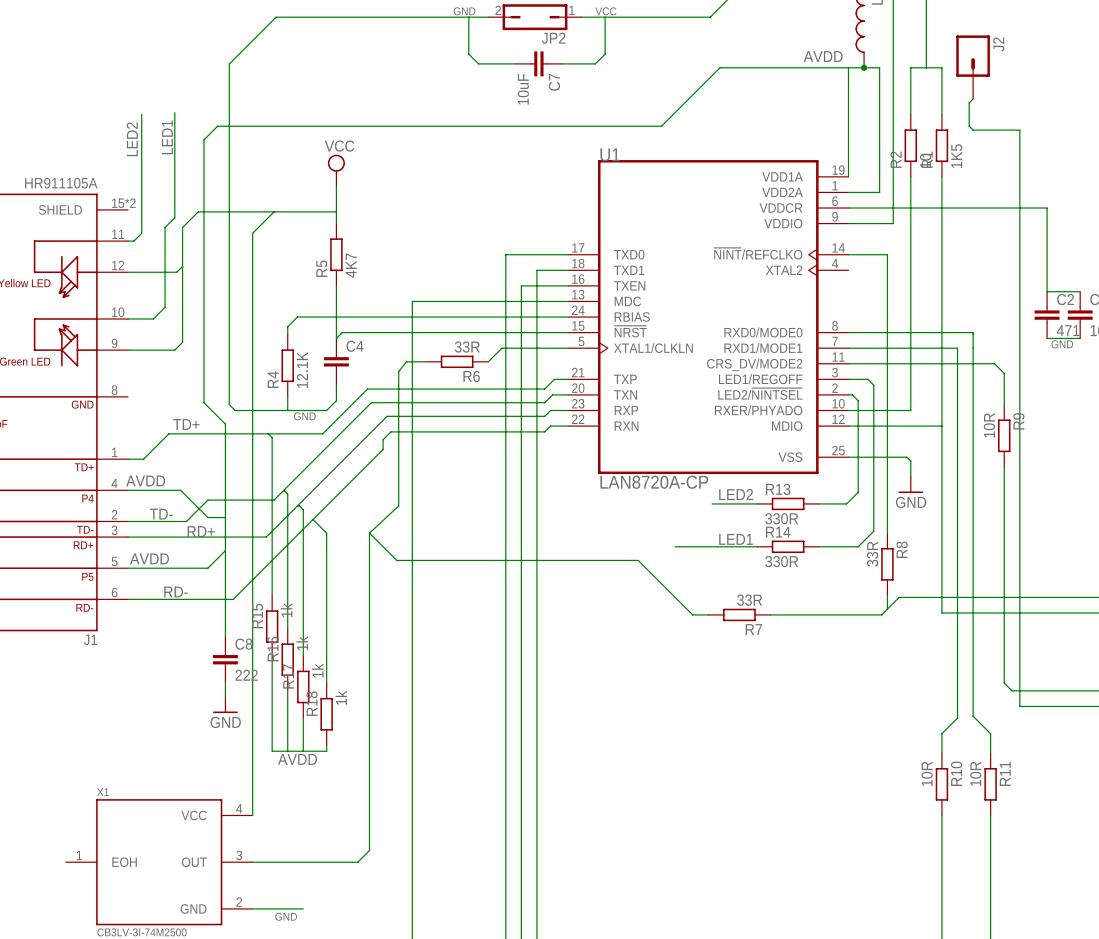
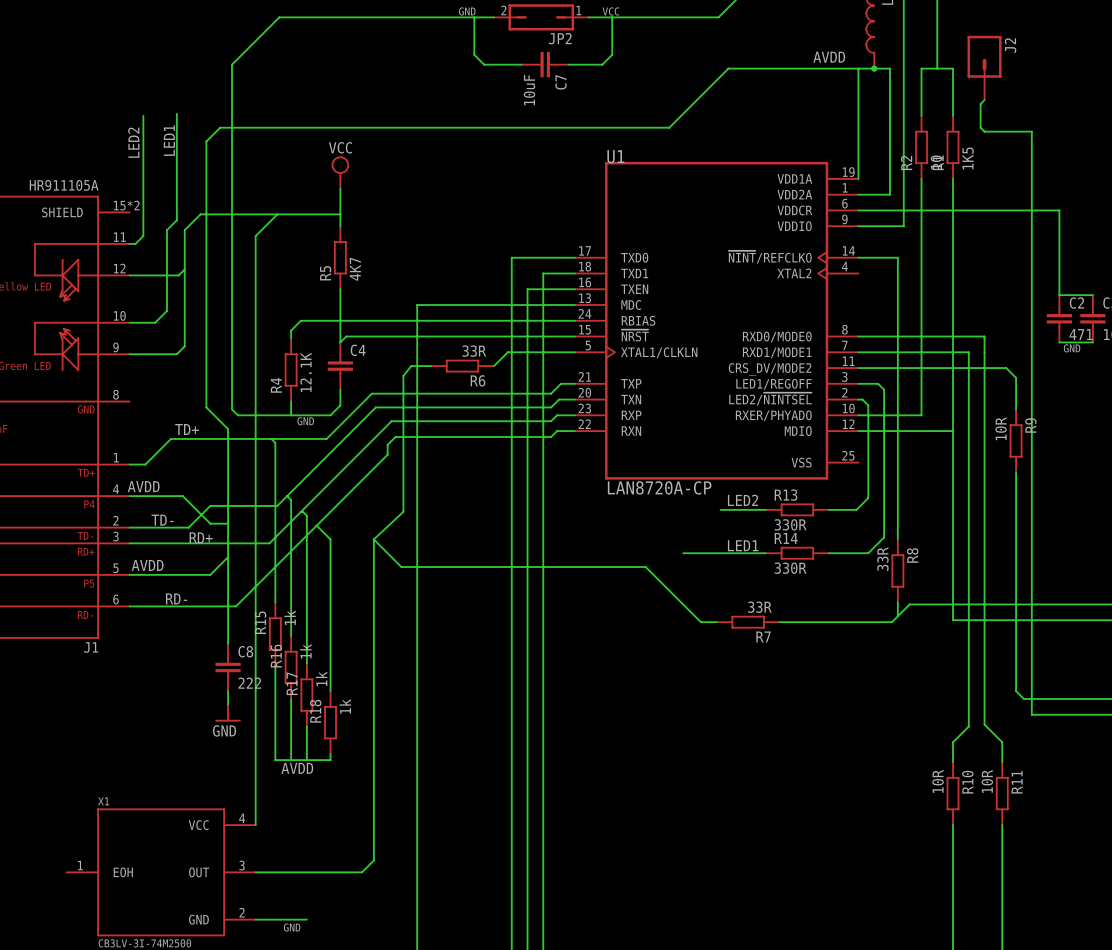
wire: (848, 457) (906, 457) (910, 461) (910, 476) -> none
power symbol: GND (910, 484) -> none

